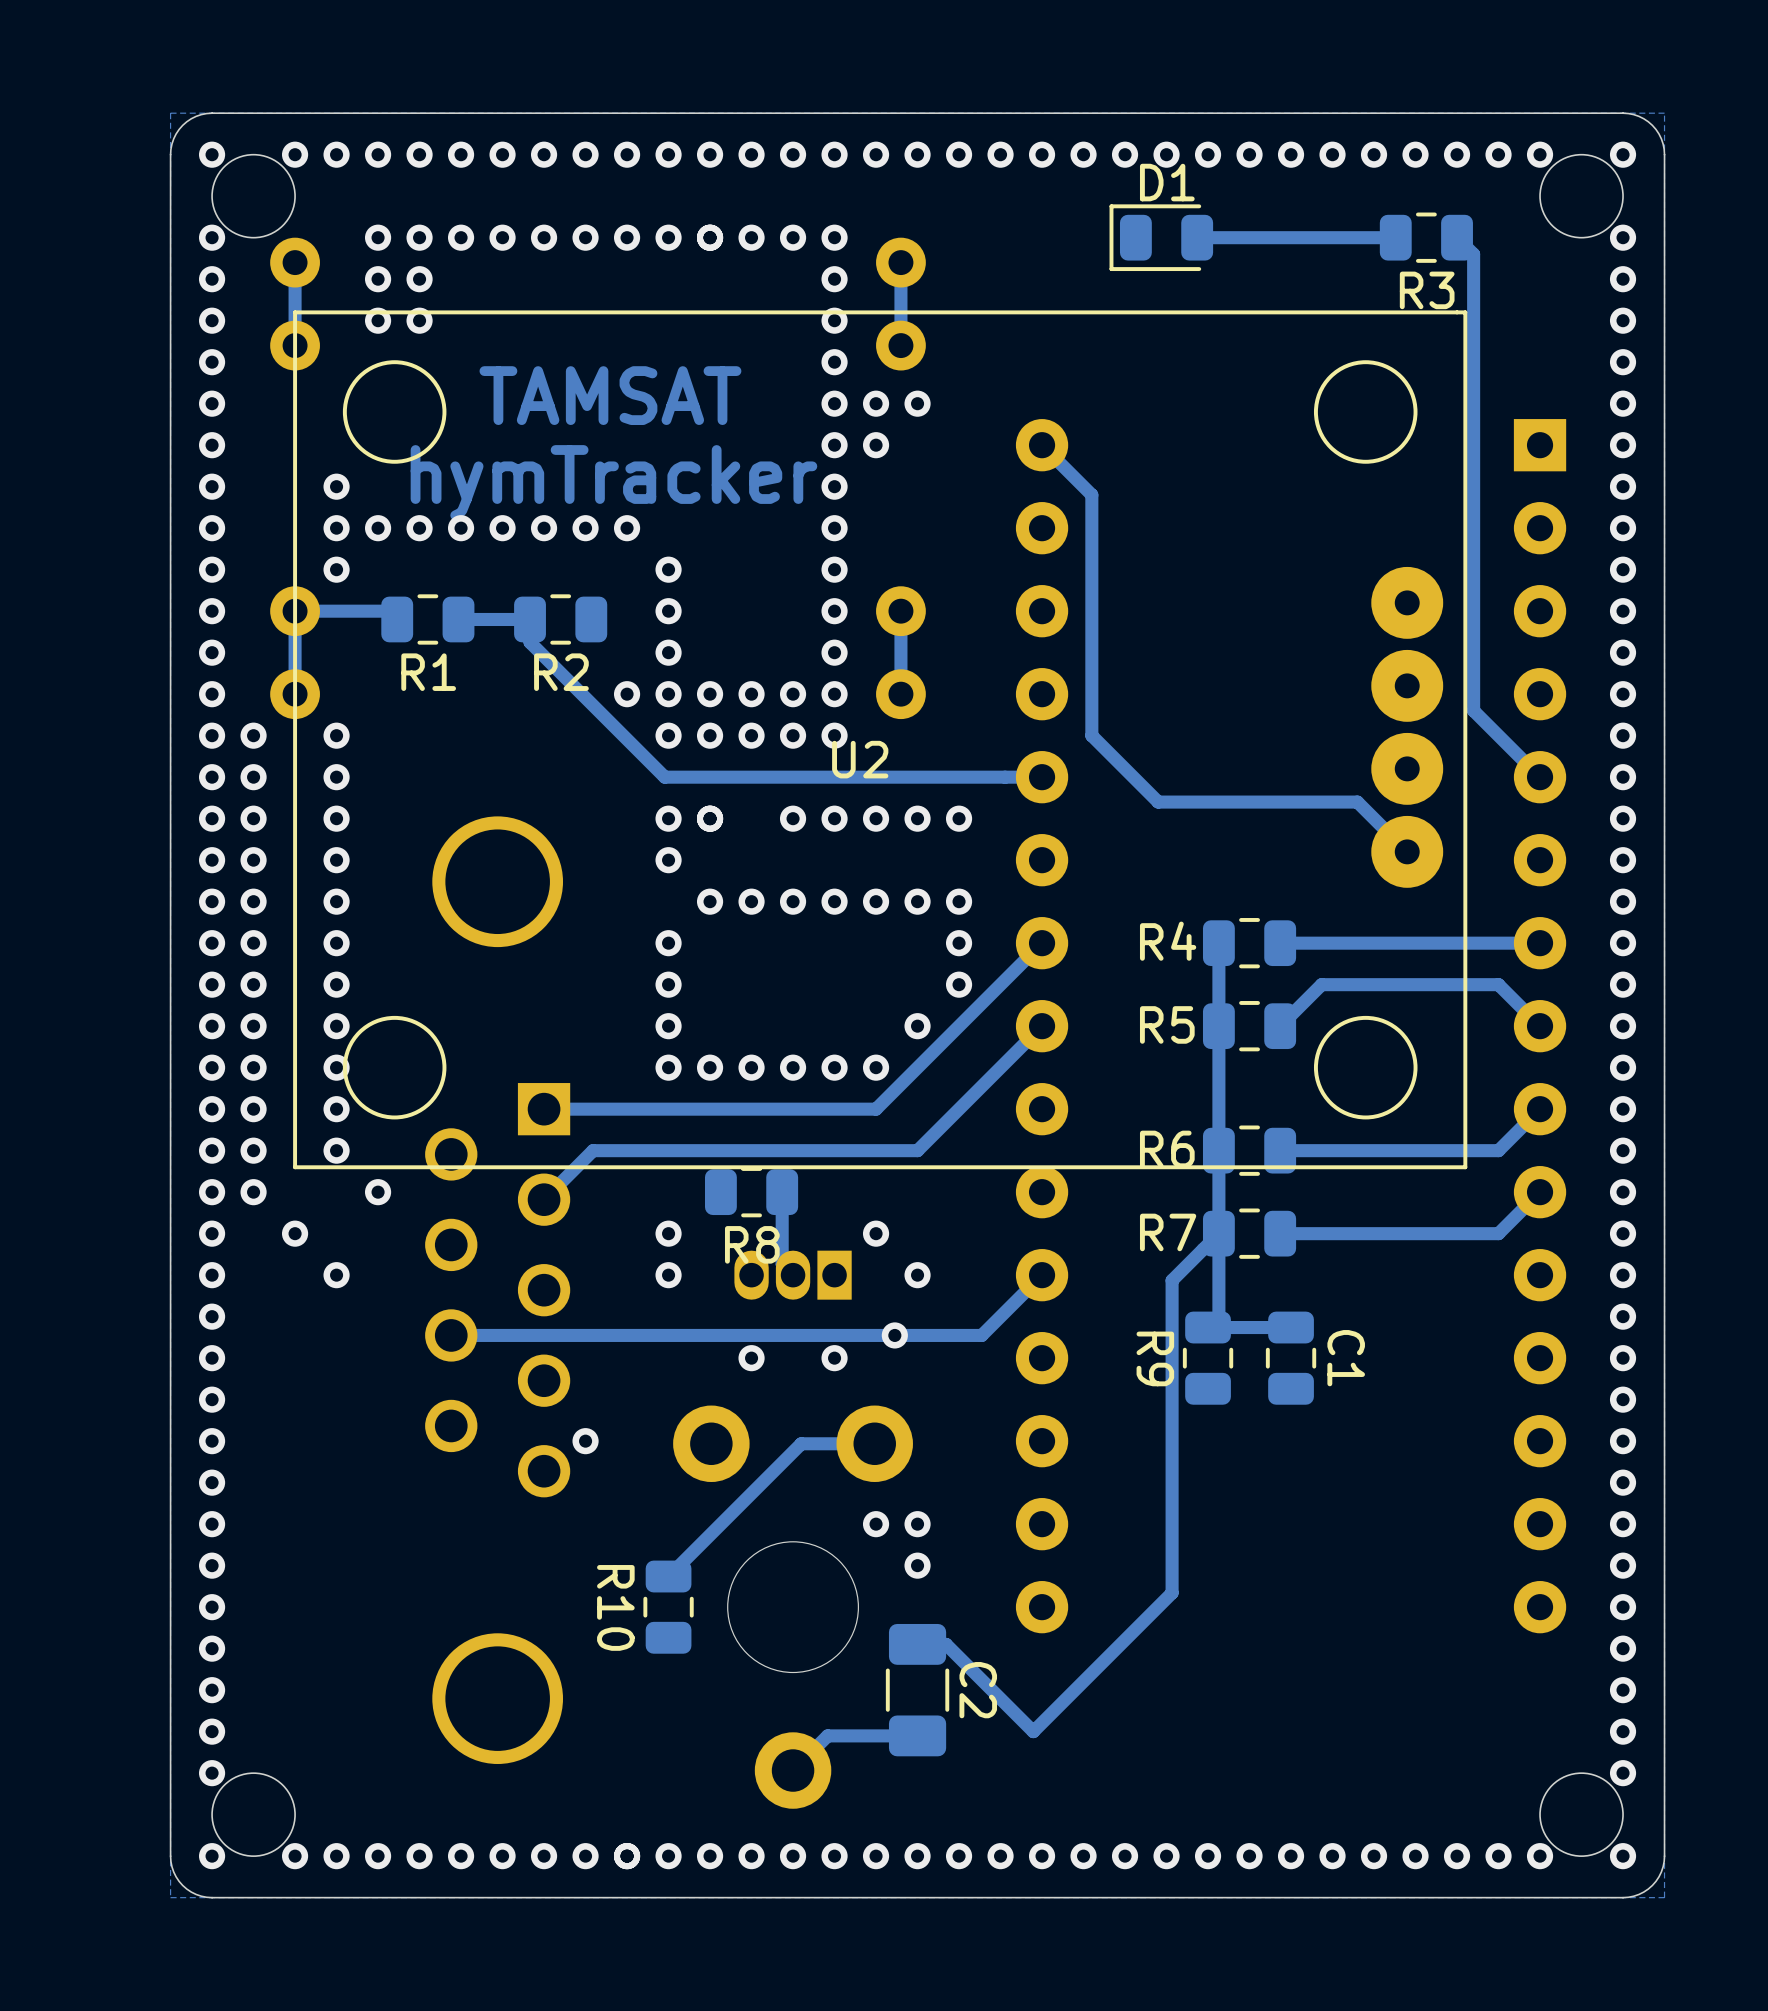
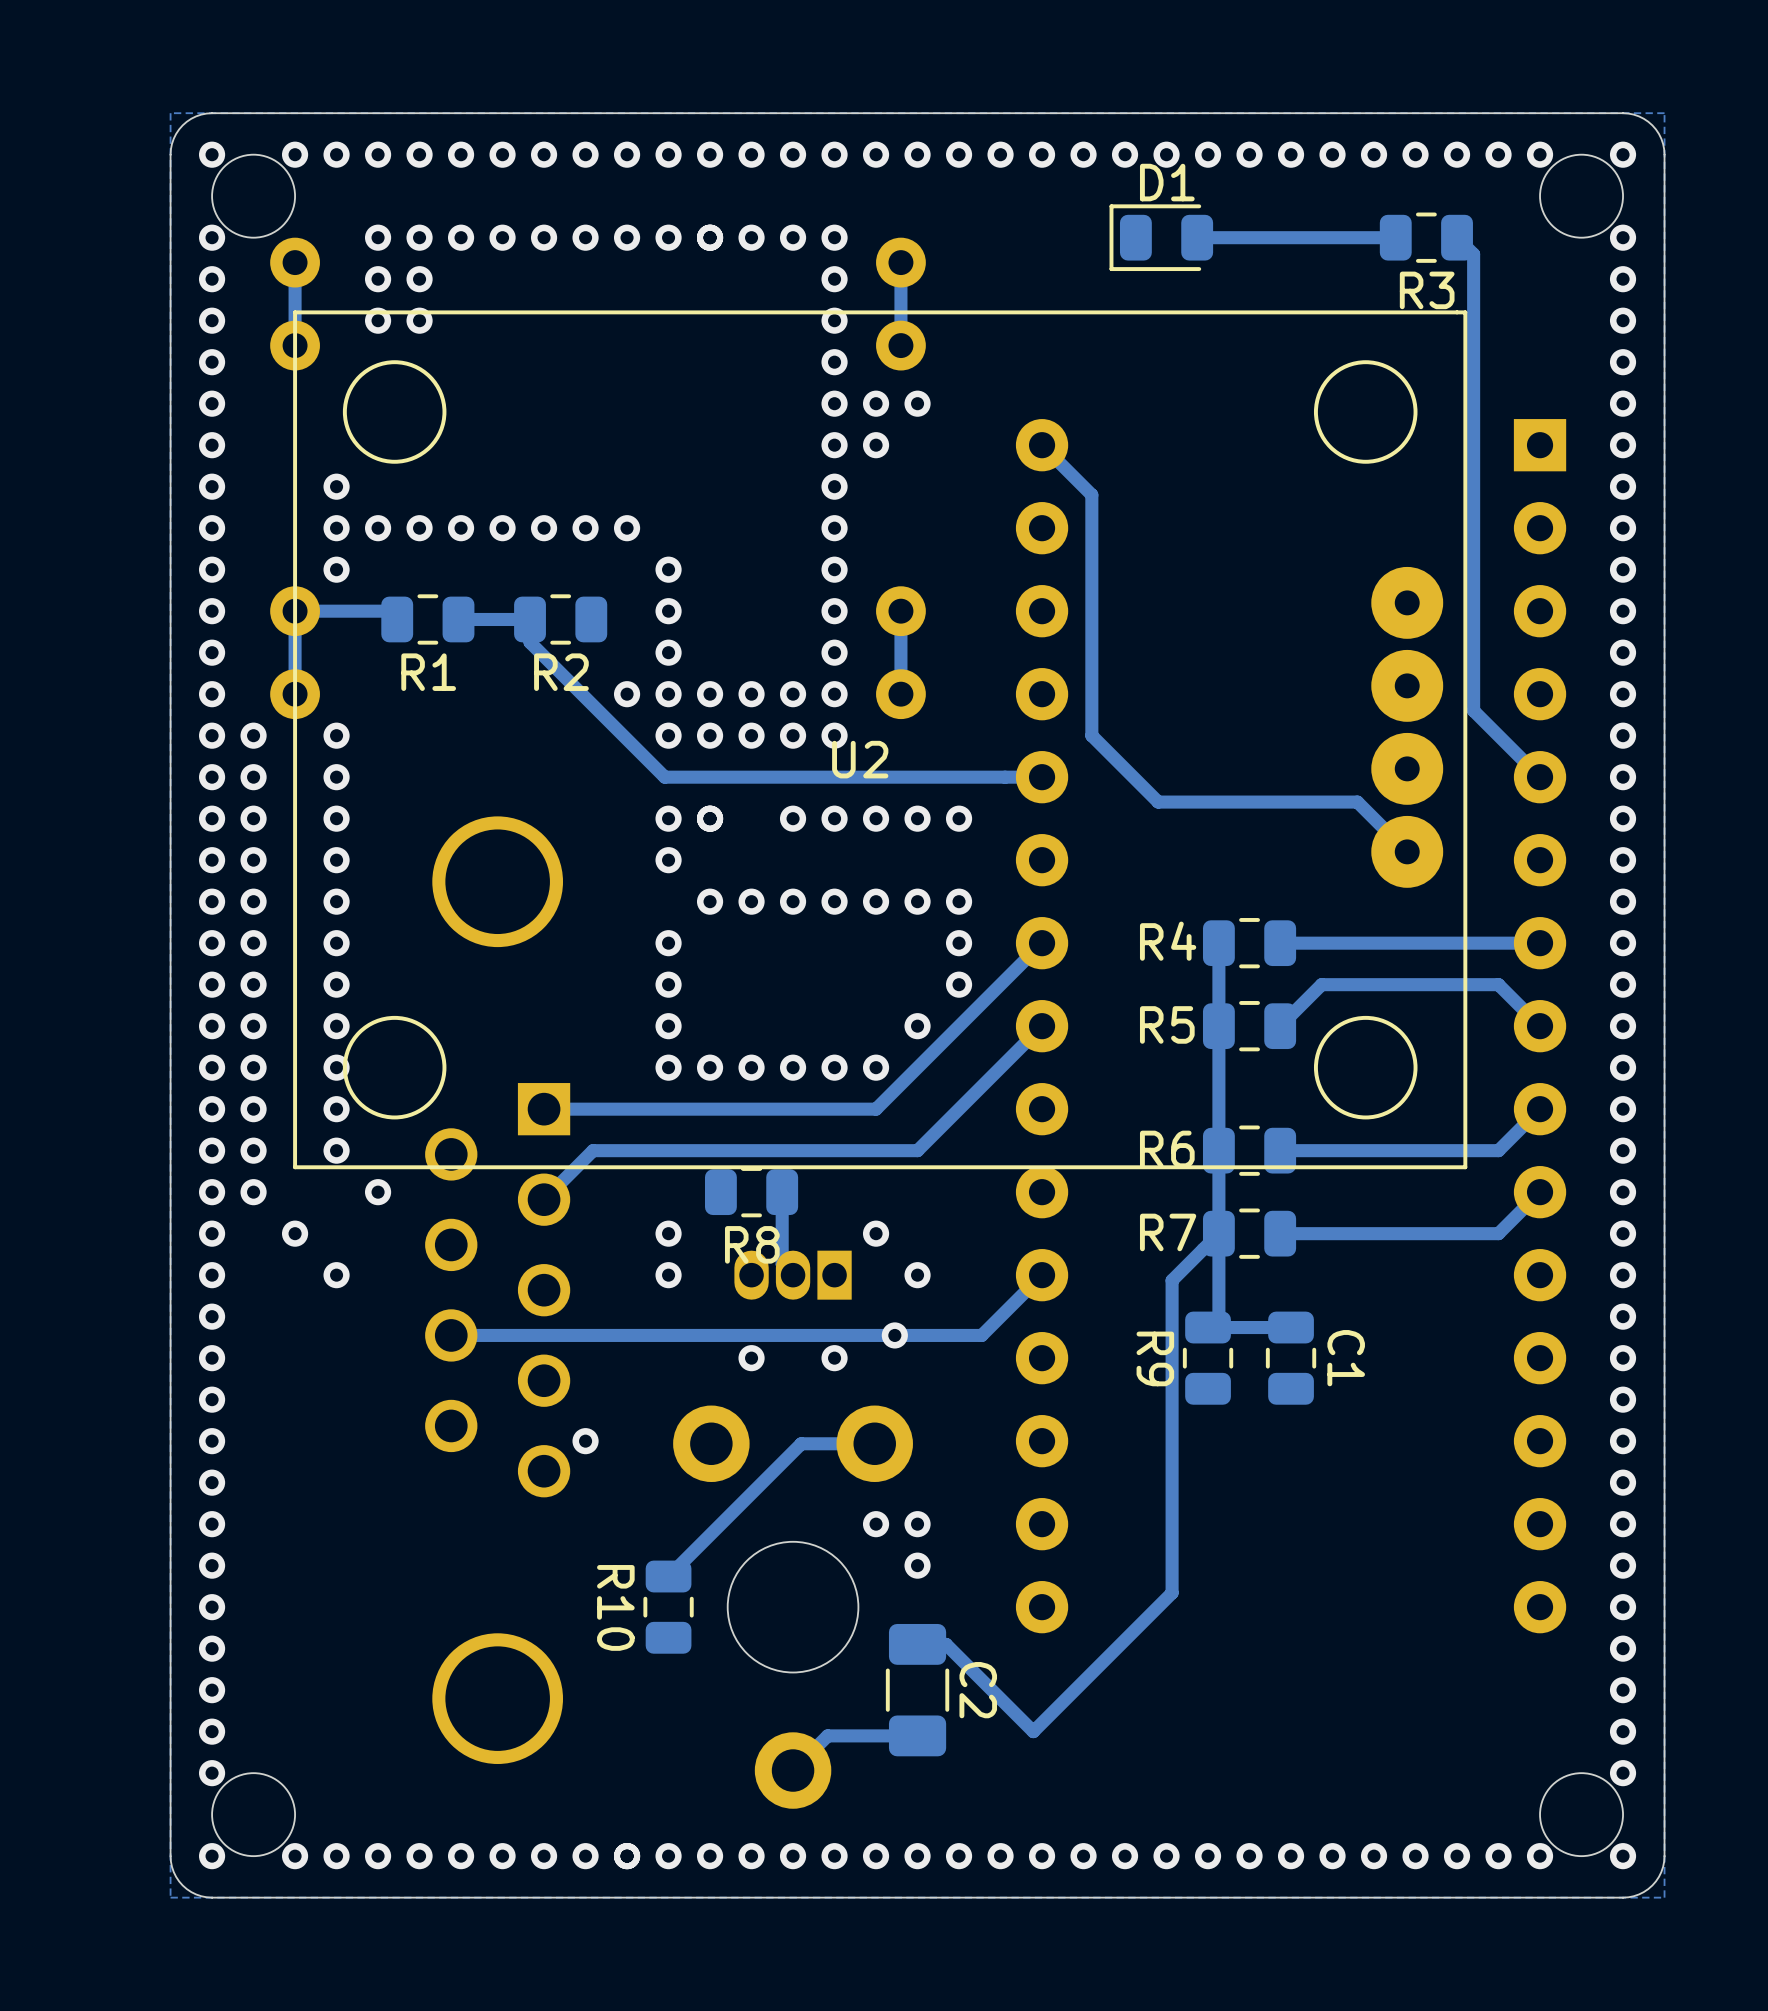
text: TAMSAT (610, 395) -> none
text: hymTracker (613, 482) -> none

